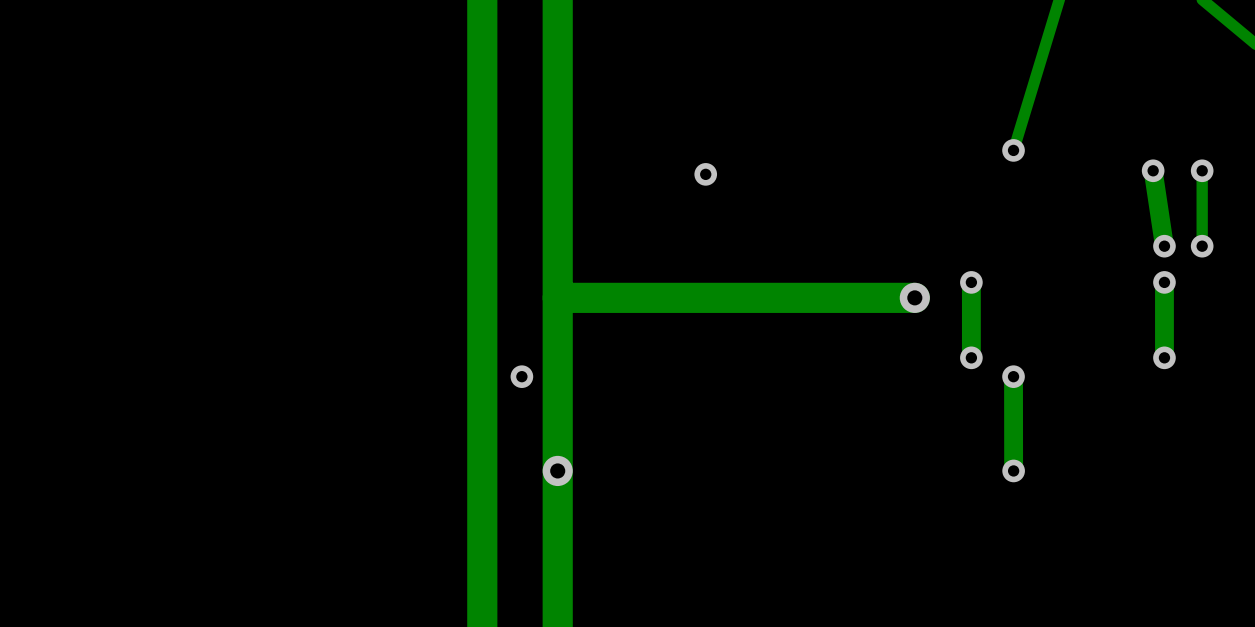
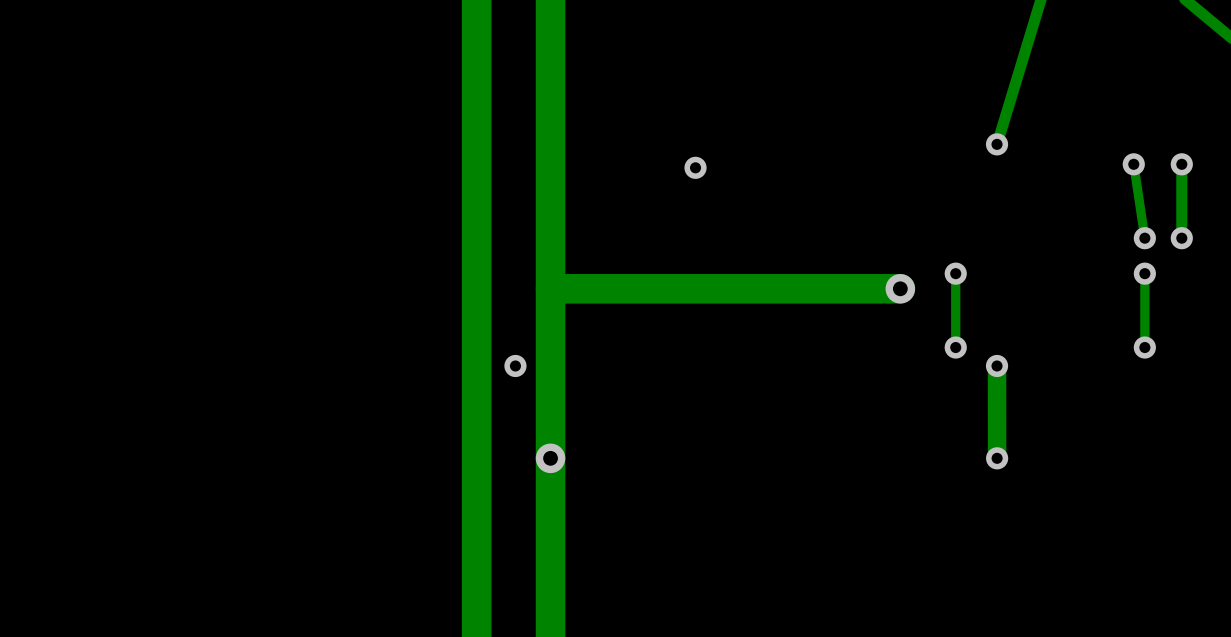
track width: thick (1153, 170) (1164, 246) -> thin (1133, 164) (1144, 238)
track width: thick (971, 282) (971, 357) -> thin (955, 273) (955, 347)
track width: thick (1164, 282) (1164, 357) -> thin (1144, 273) (1144, 347)

